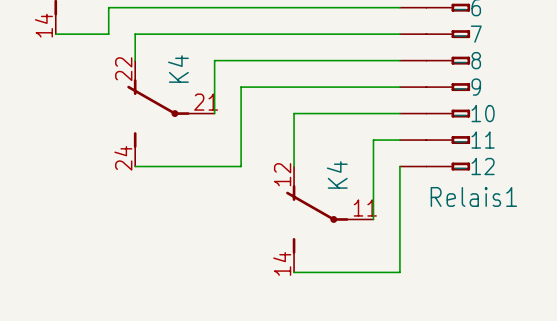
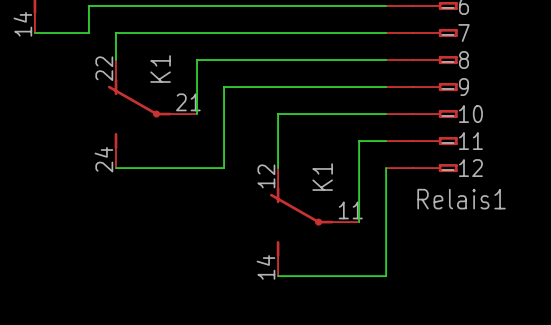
K4 name: K4 (178, 69) -> K1 (160, 69)
K4 name: K4 (337, 174) -> K1 (322, 177)

